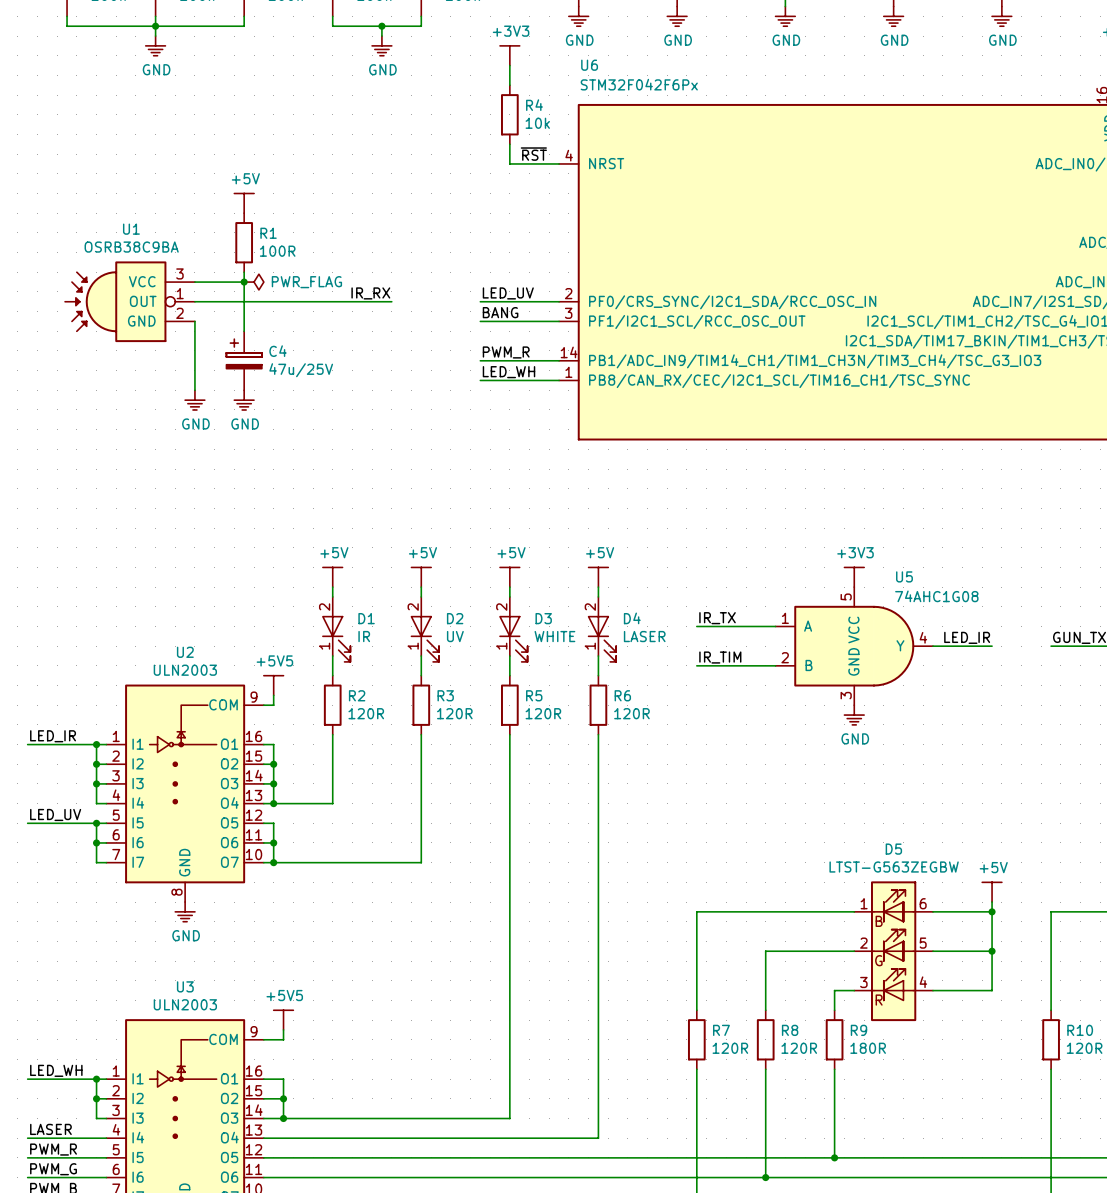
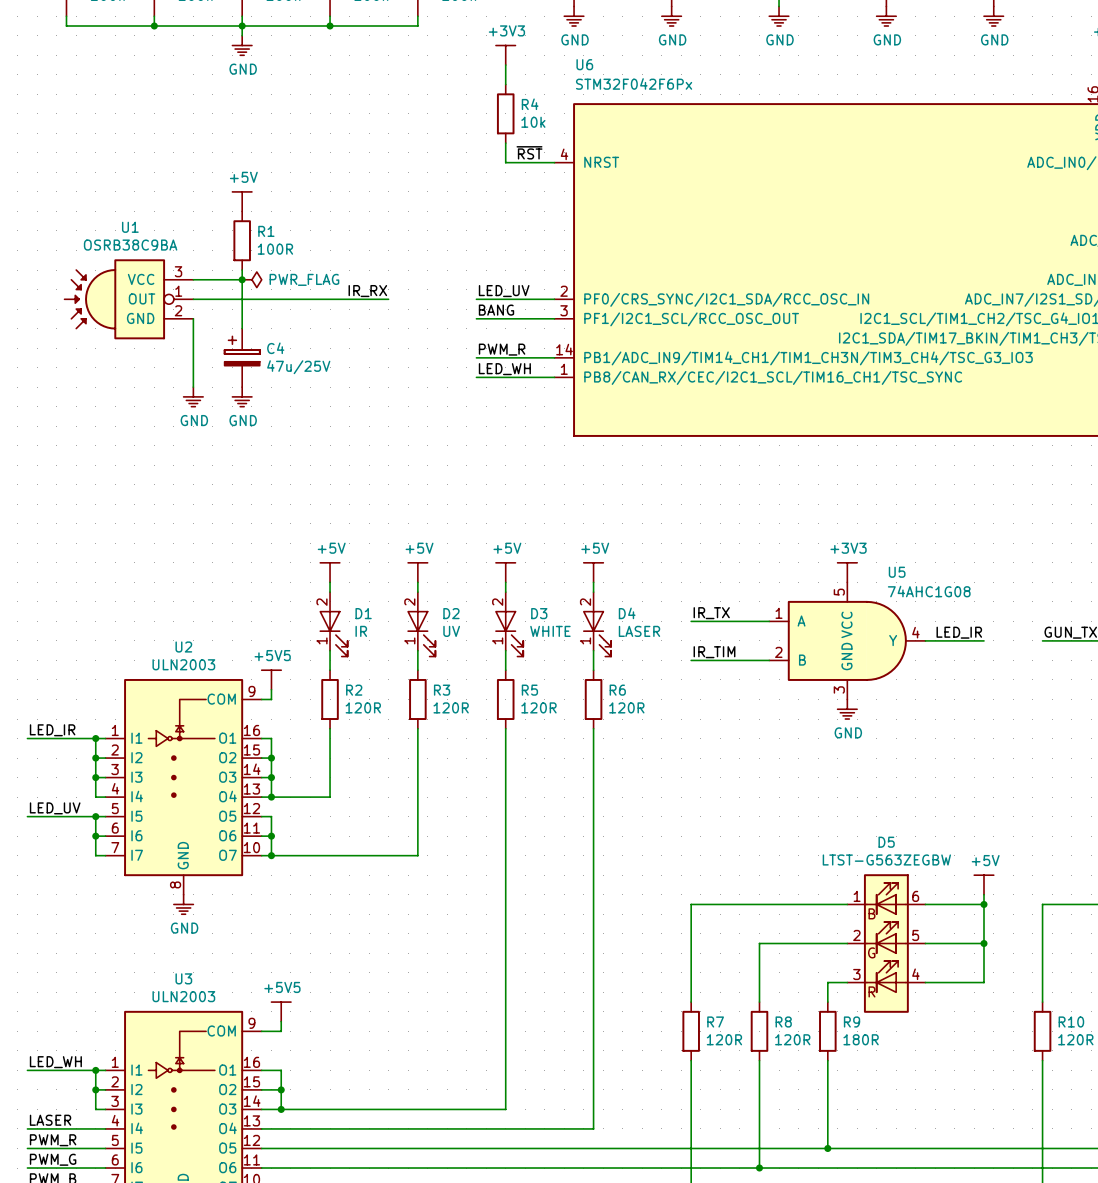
wire: (155, 26) (155, 36) -> none
junction: none -> (242, 26)
wire: none -> (330, 26) (242, 26) (242, 35)
junction: none -> (330, 26)
wire: (381, 26) (381, 36) -> none
junction: (381, 26) -> none
power symbol: GND (155, 45) -> none
power symbol: none -> GND (242, 45)
power symbol: GND (381, 45) -> none

